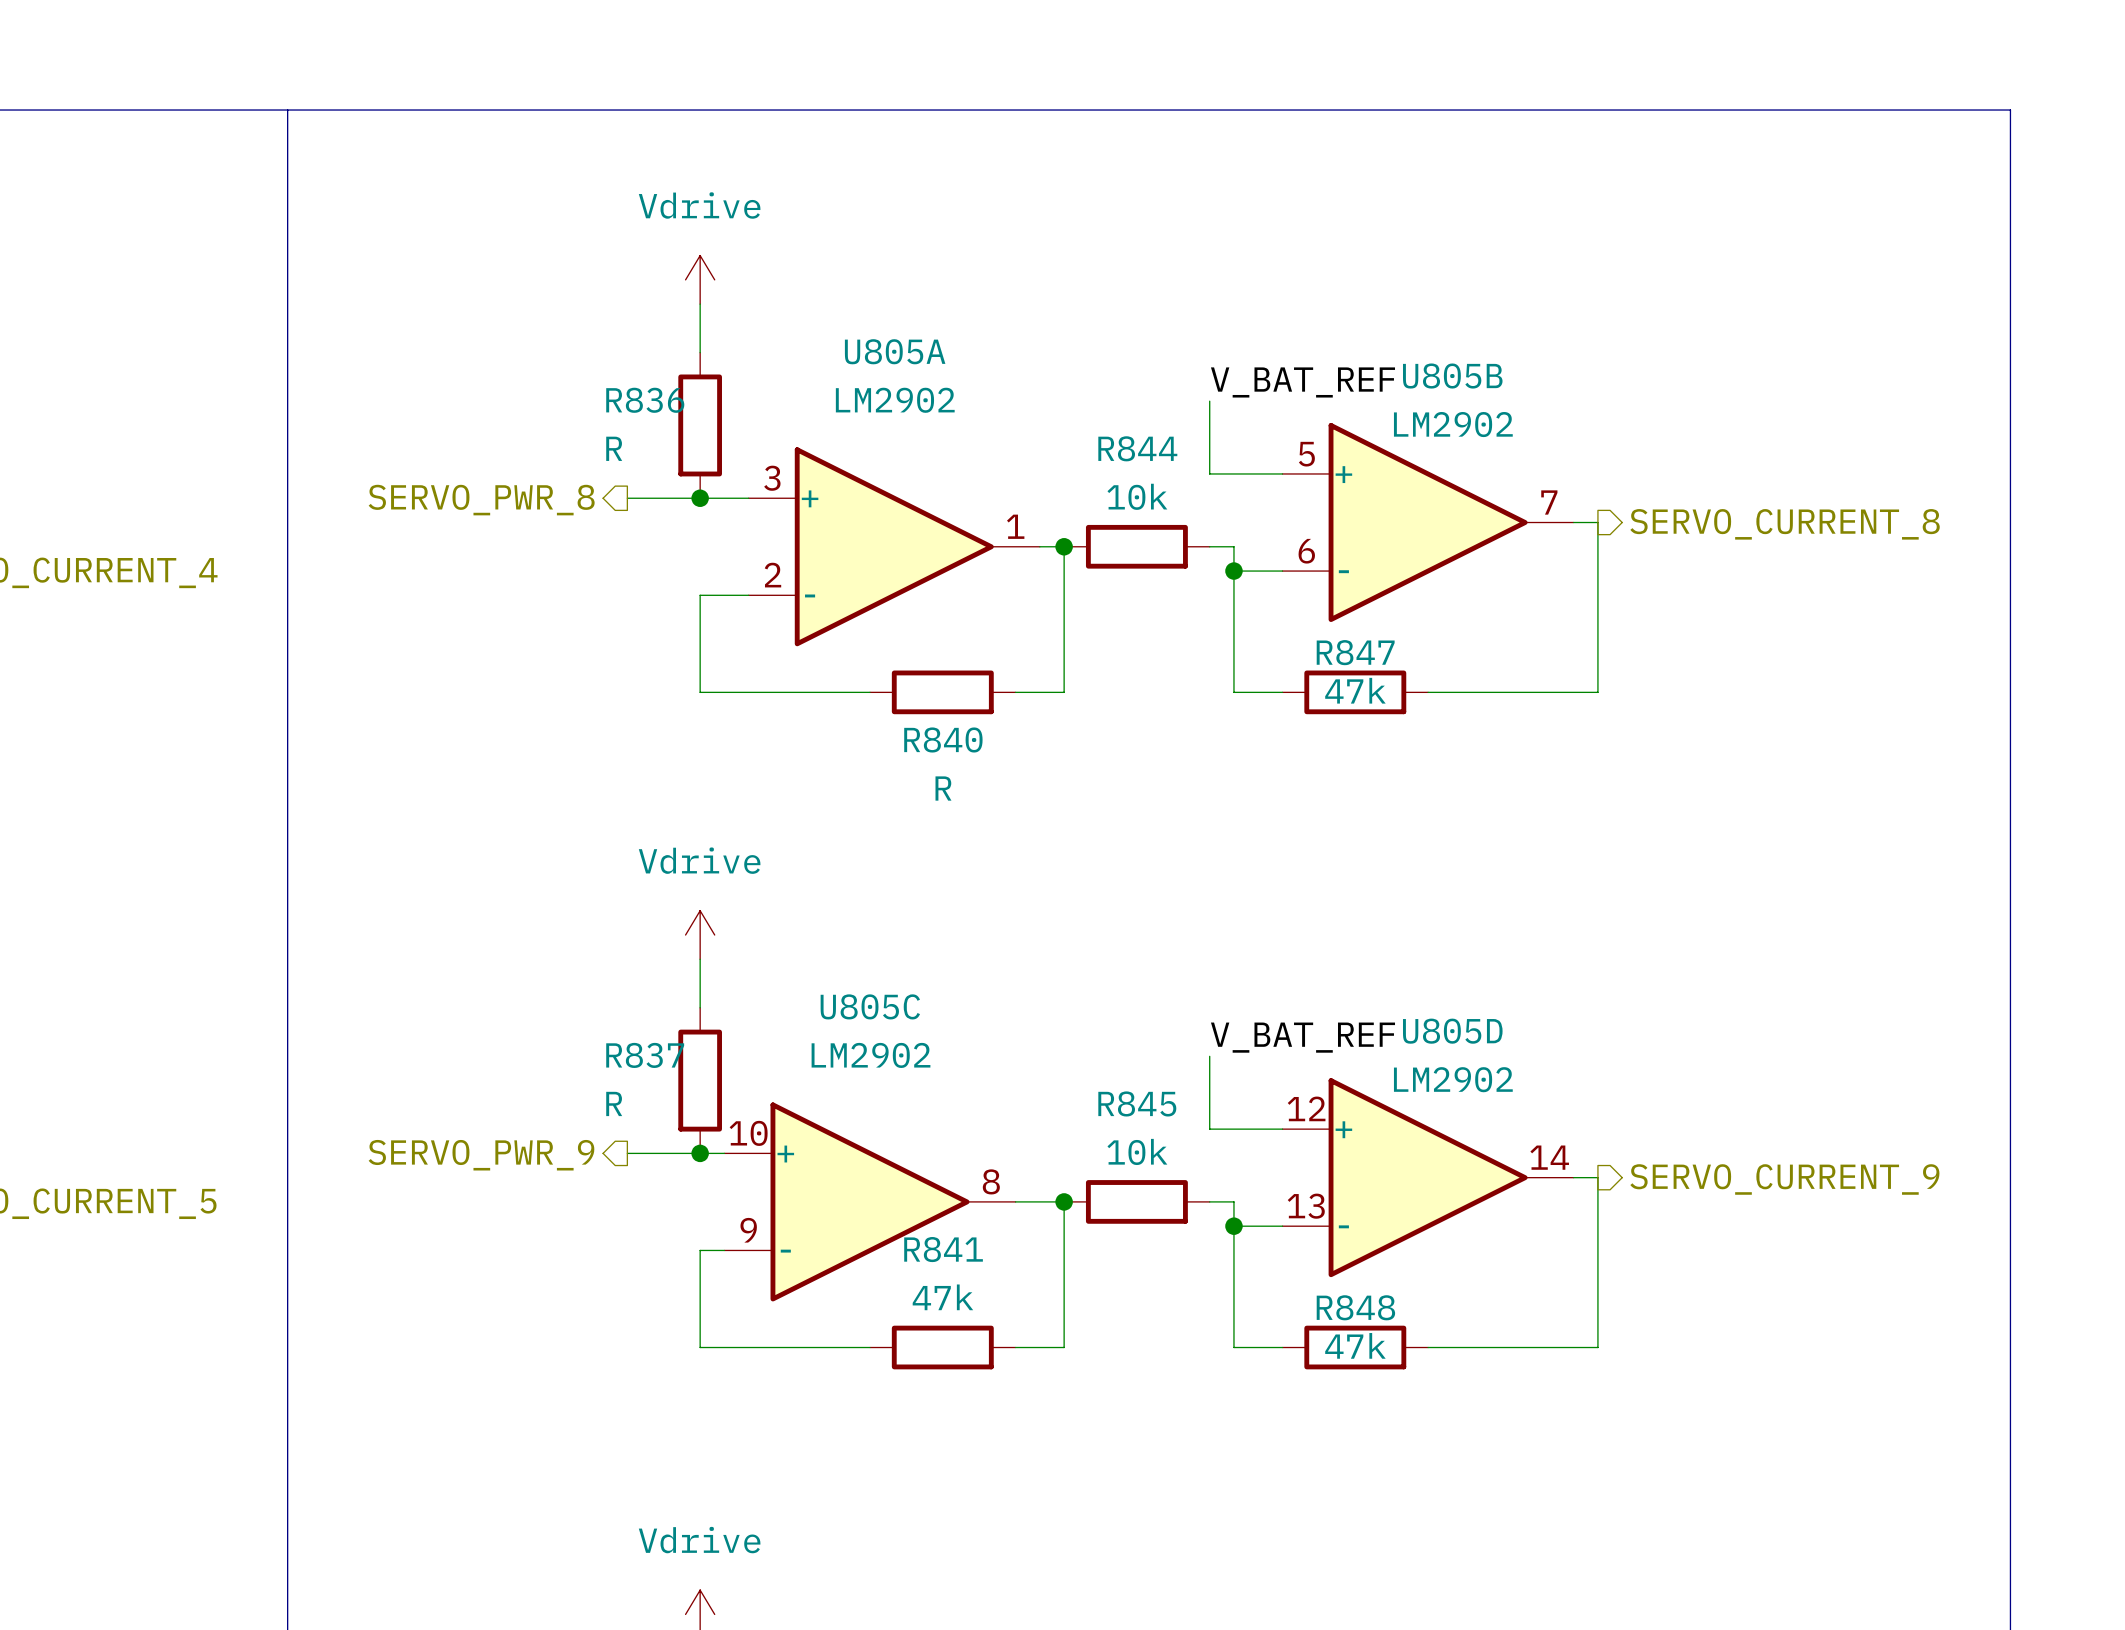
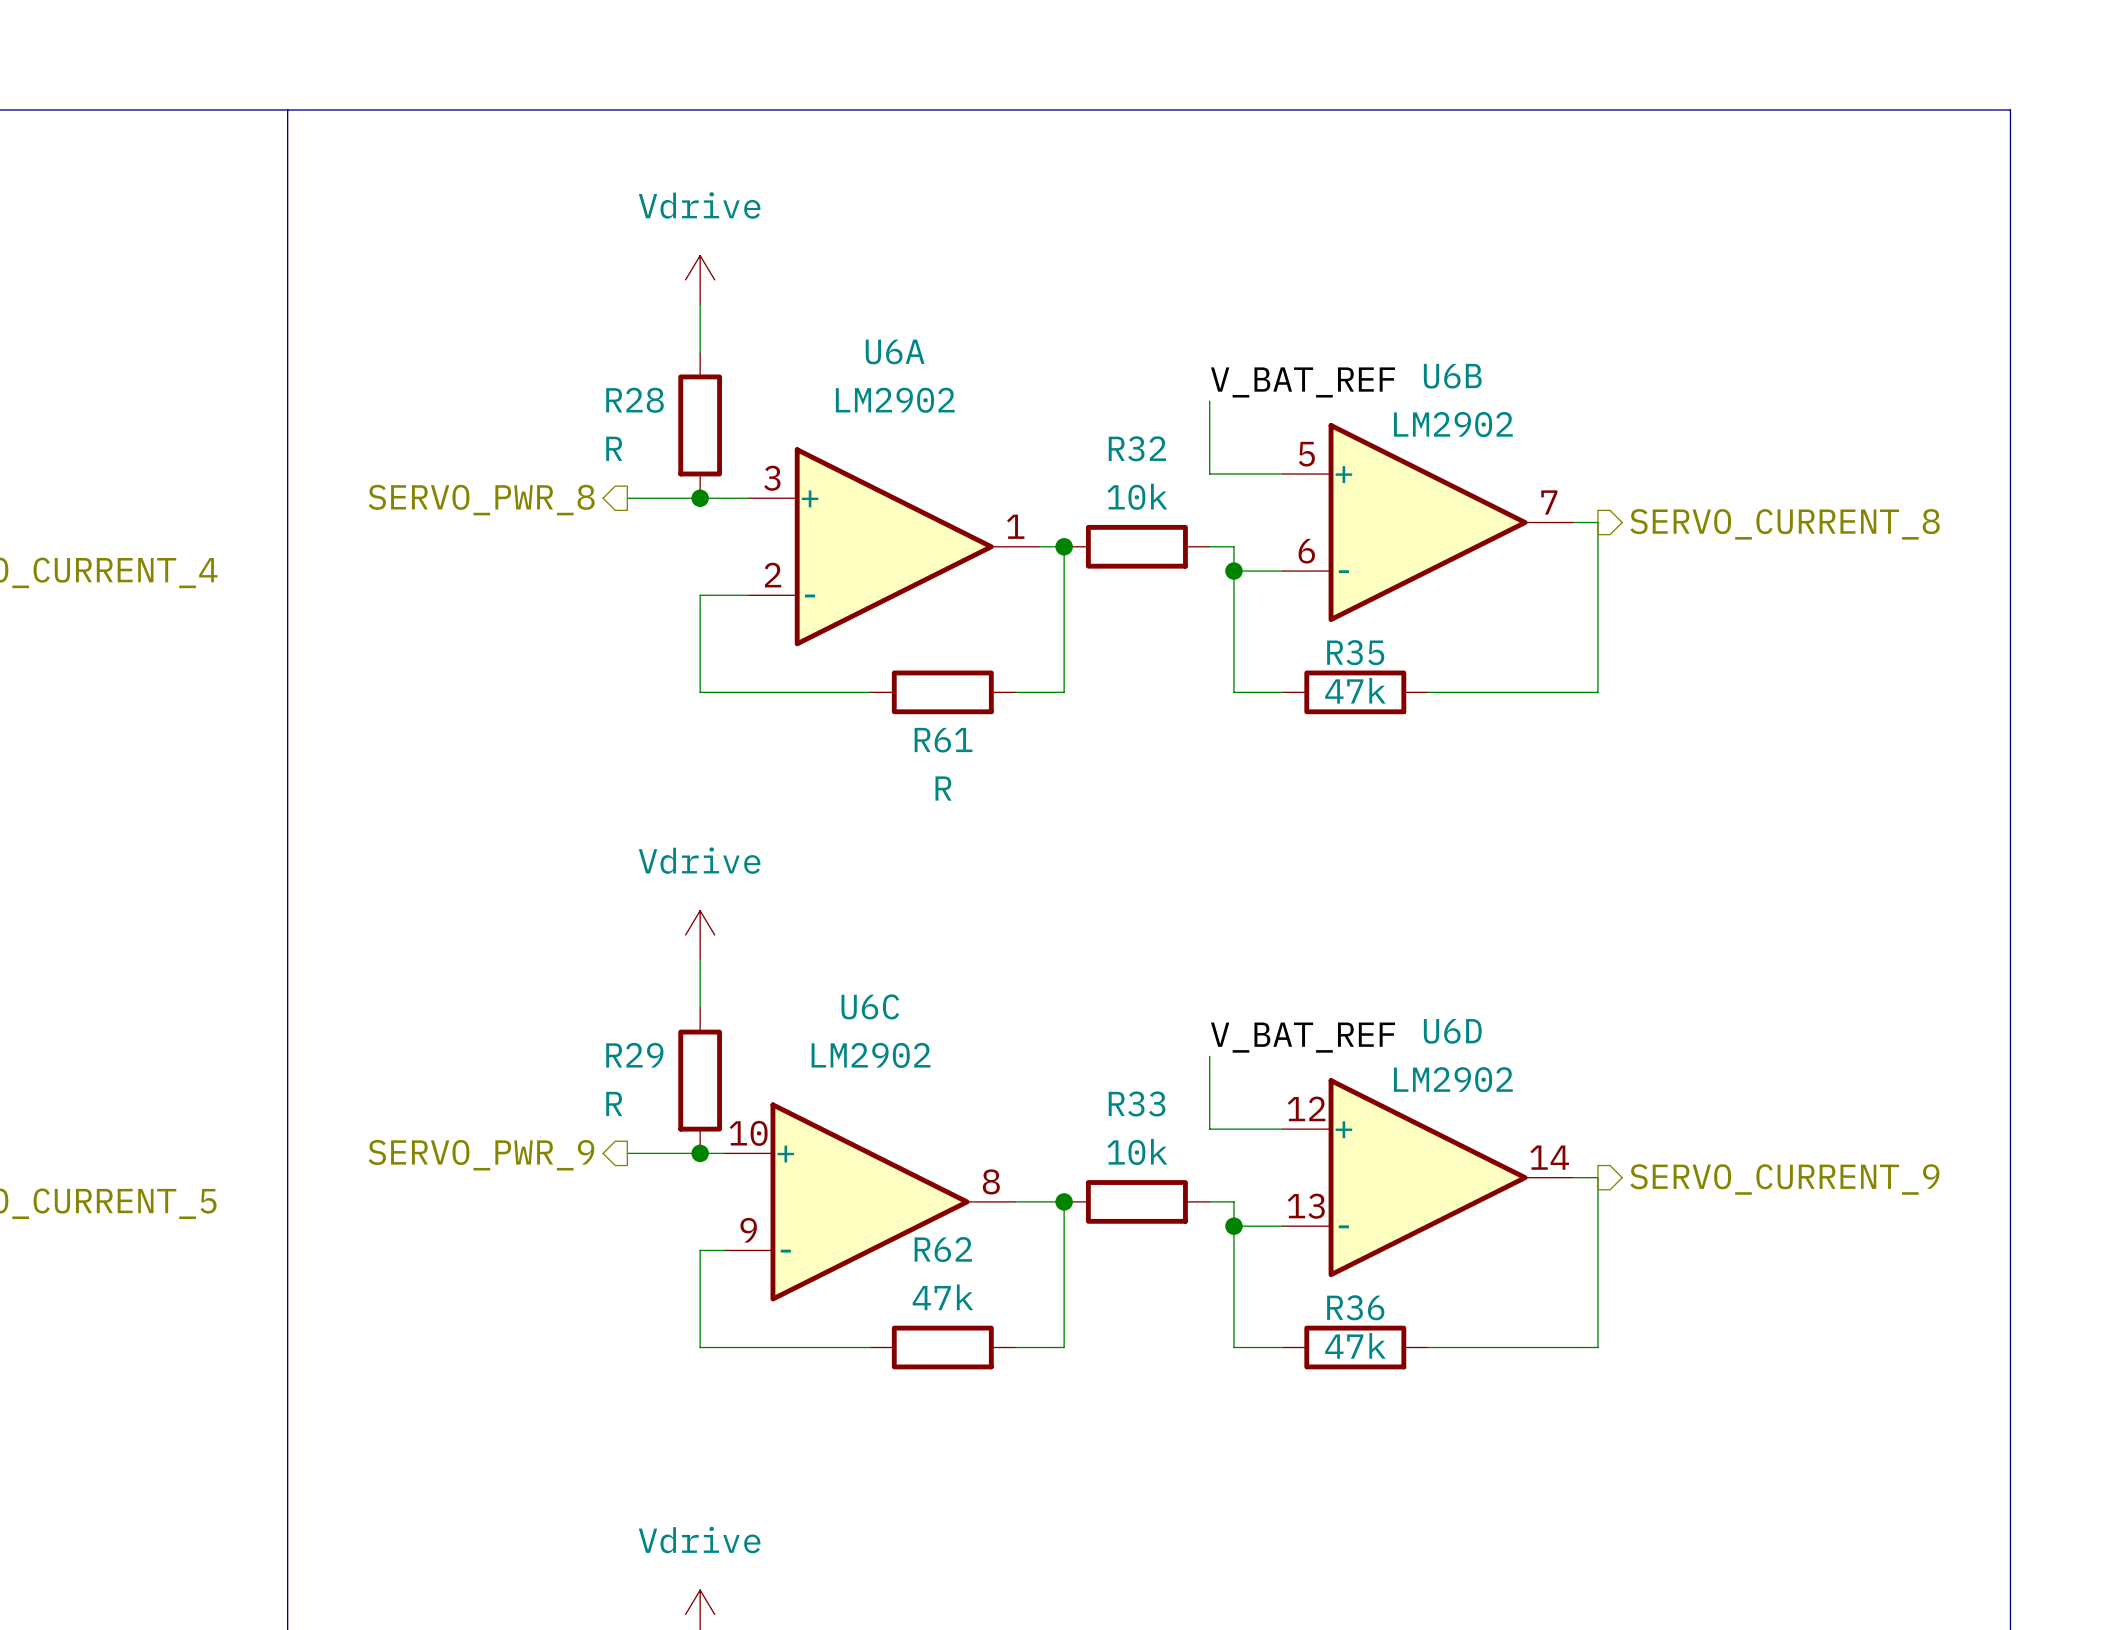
U805A name: U805A (895, 351) -> U6A (895, 351)
U805B name: U805B (1452, 376) -> U6B (1452, 376)
R836 name: R836 (645, 400) -> R28 (634, 400)
R844 name: R844 (1137, 448) -> R32 (1137, 448)
R847 name: R847 (1355, 652) -> R35 (1355, 652)
R840 name: R840 (943, 739) -> R61 (943, 740)
U805C name: U805C (870, 1006) -> U6C (870, 1006)
U805D name: U805D (1452, 1031) -> U6D (1452, 1031)
R837 name: R837 (645, 1055) -> R29 (634, 1055)
R845 name: R845 (1137, 1103) -> R33 (1137, 1103)
R841 name: R841 (943, 1249) -> R62 (943, 1249)
R848 name: R848 (1355, 1307) -> R36 (1355, 1307)

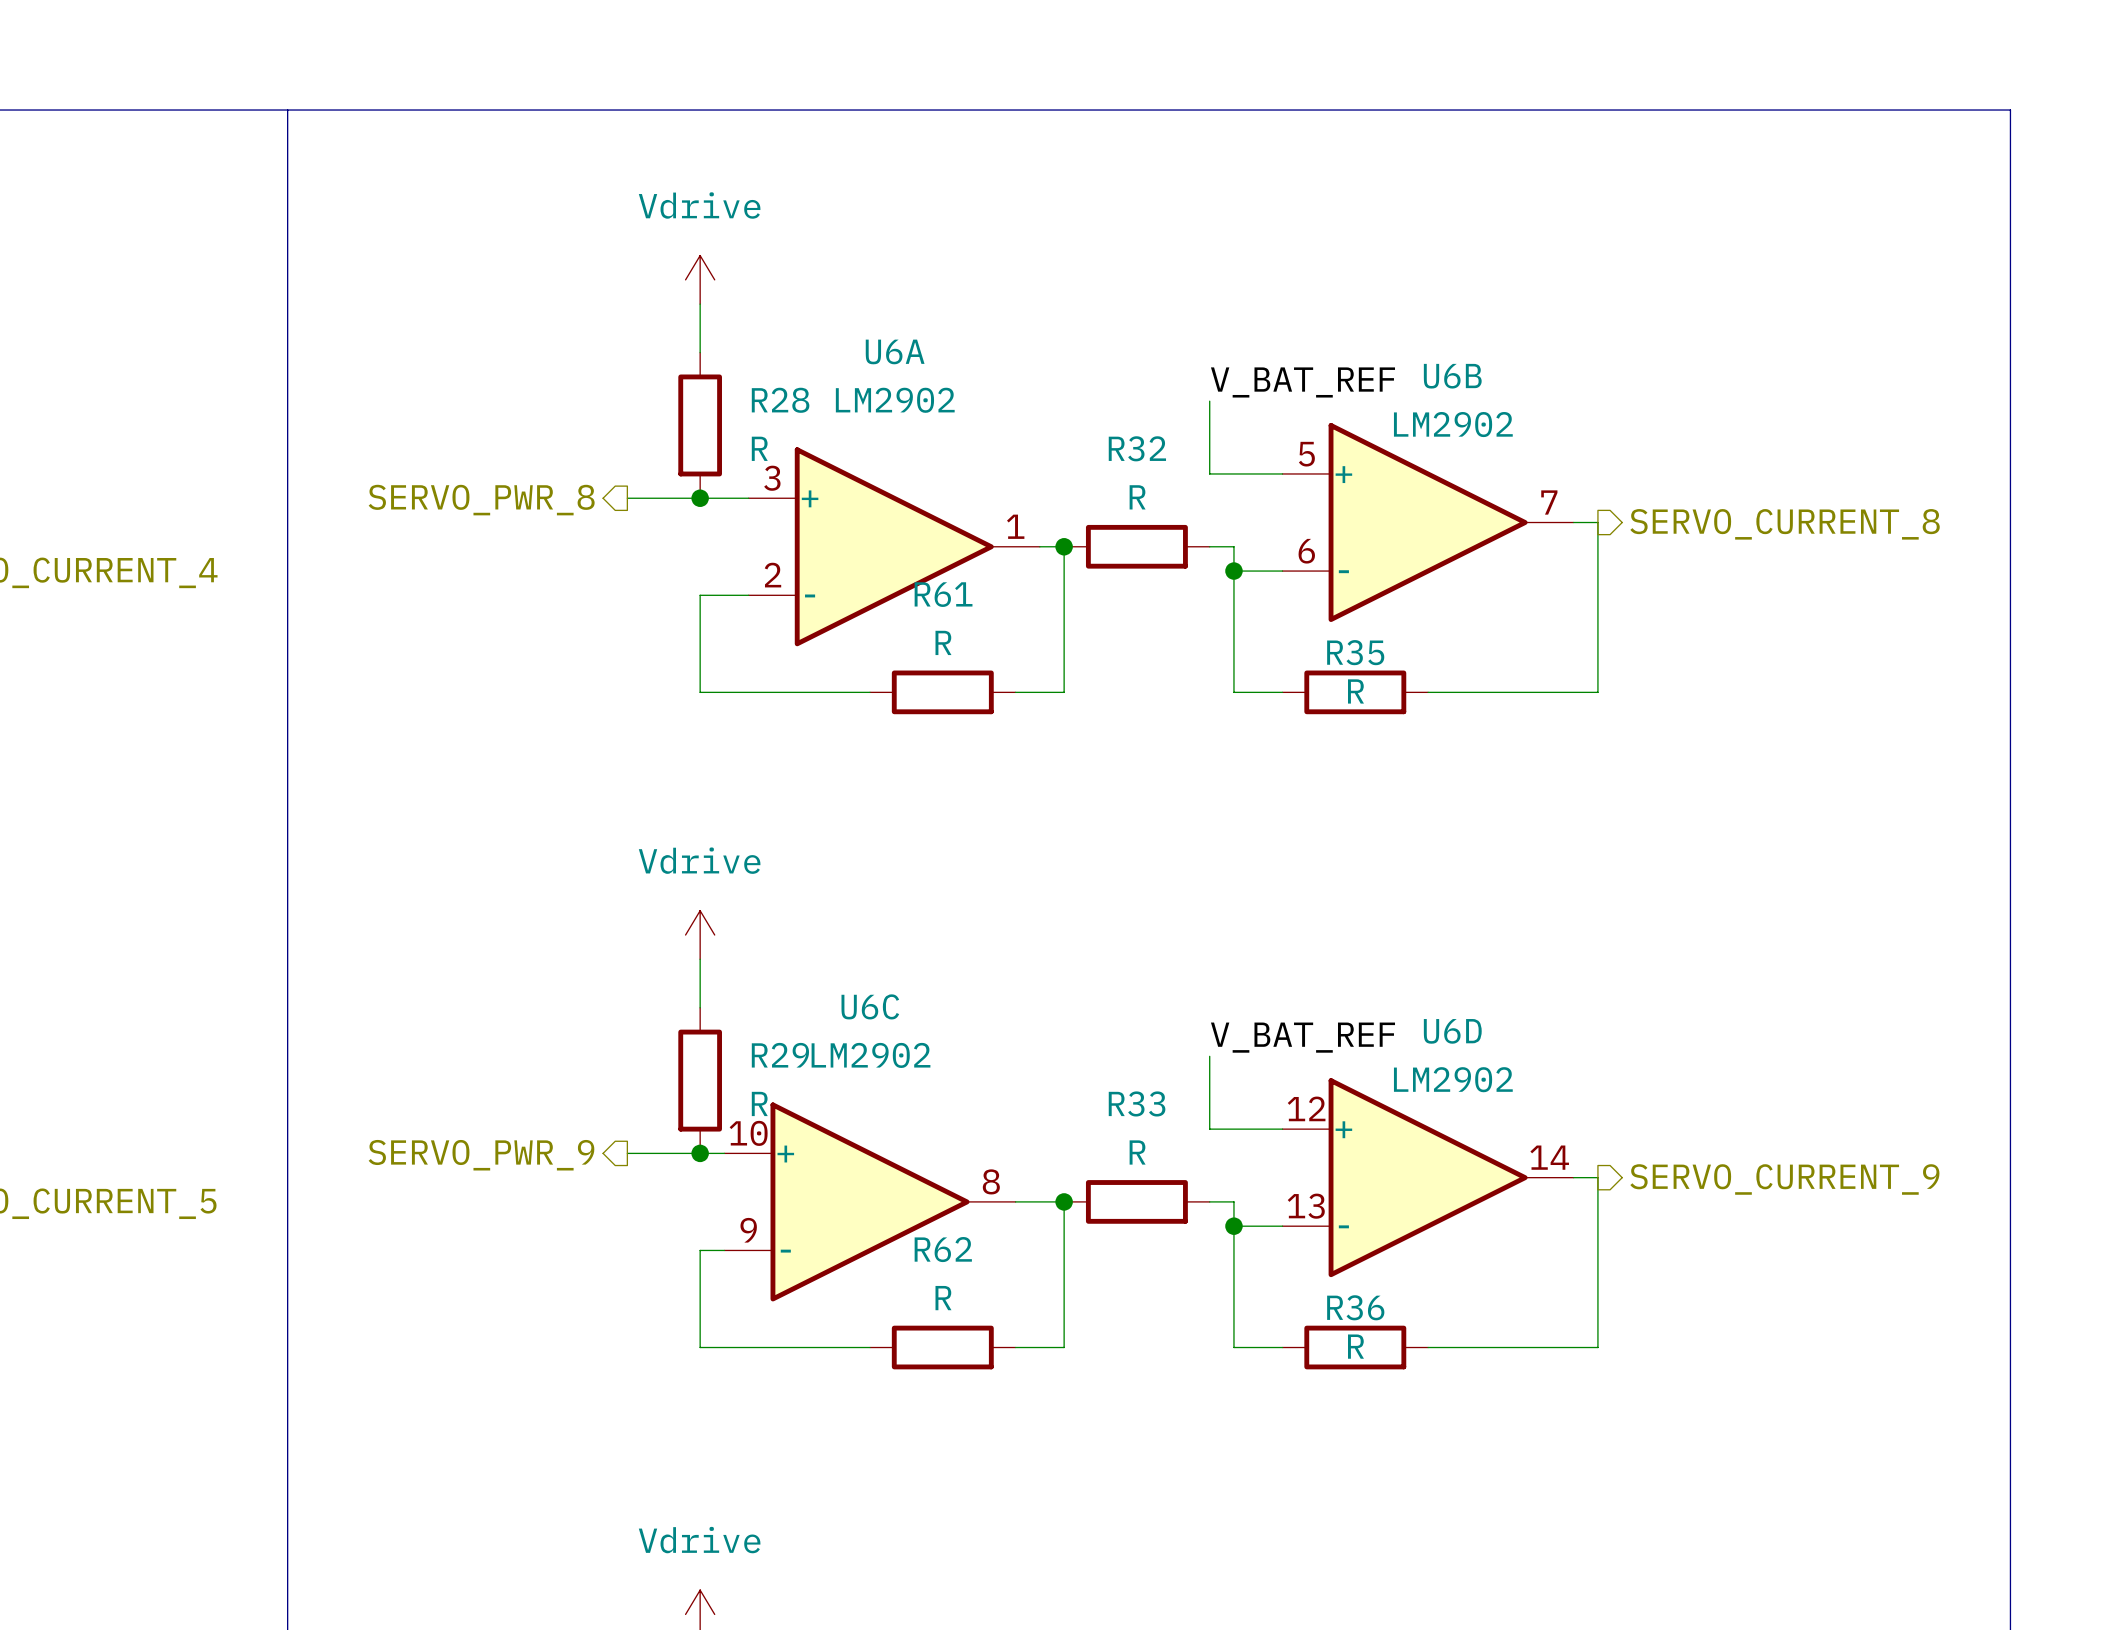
R28 name position: R28 (634, 400) -> R28 (780, 400)
R28 value position: R (614, 448) -> R (759, 448)
R32 value: 10k (1137, 496) -> R (1137, 497)
R35 value: 47k (1355, 690) -> R (1355, 691)
R61 name position: R61 (943, 740) -> R61 (943, 594)
R61 value position: R (943, 788) -> R (943, 642)
R29 name position: R29 (634, 1055) -> R29 (780, 1055)
R29 value position: R (614, 1103) -> R (759, 1103)
R33 value: 10k (1137, 1151) -> R (1137, 1152)
R62 value: 47k (942, 1297) -> R (943, 1298)
R36 value: 47k (1355, 1345) -> R (1355, 1346)

